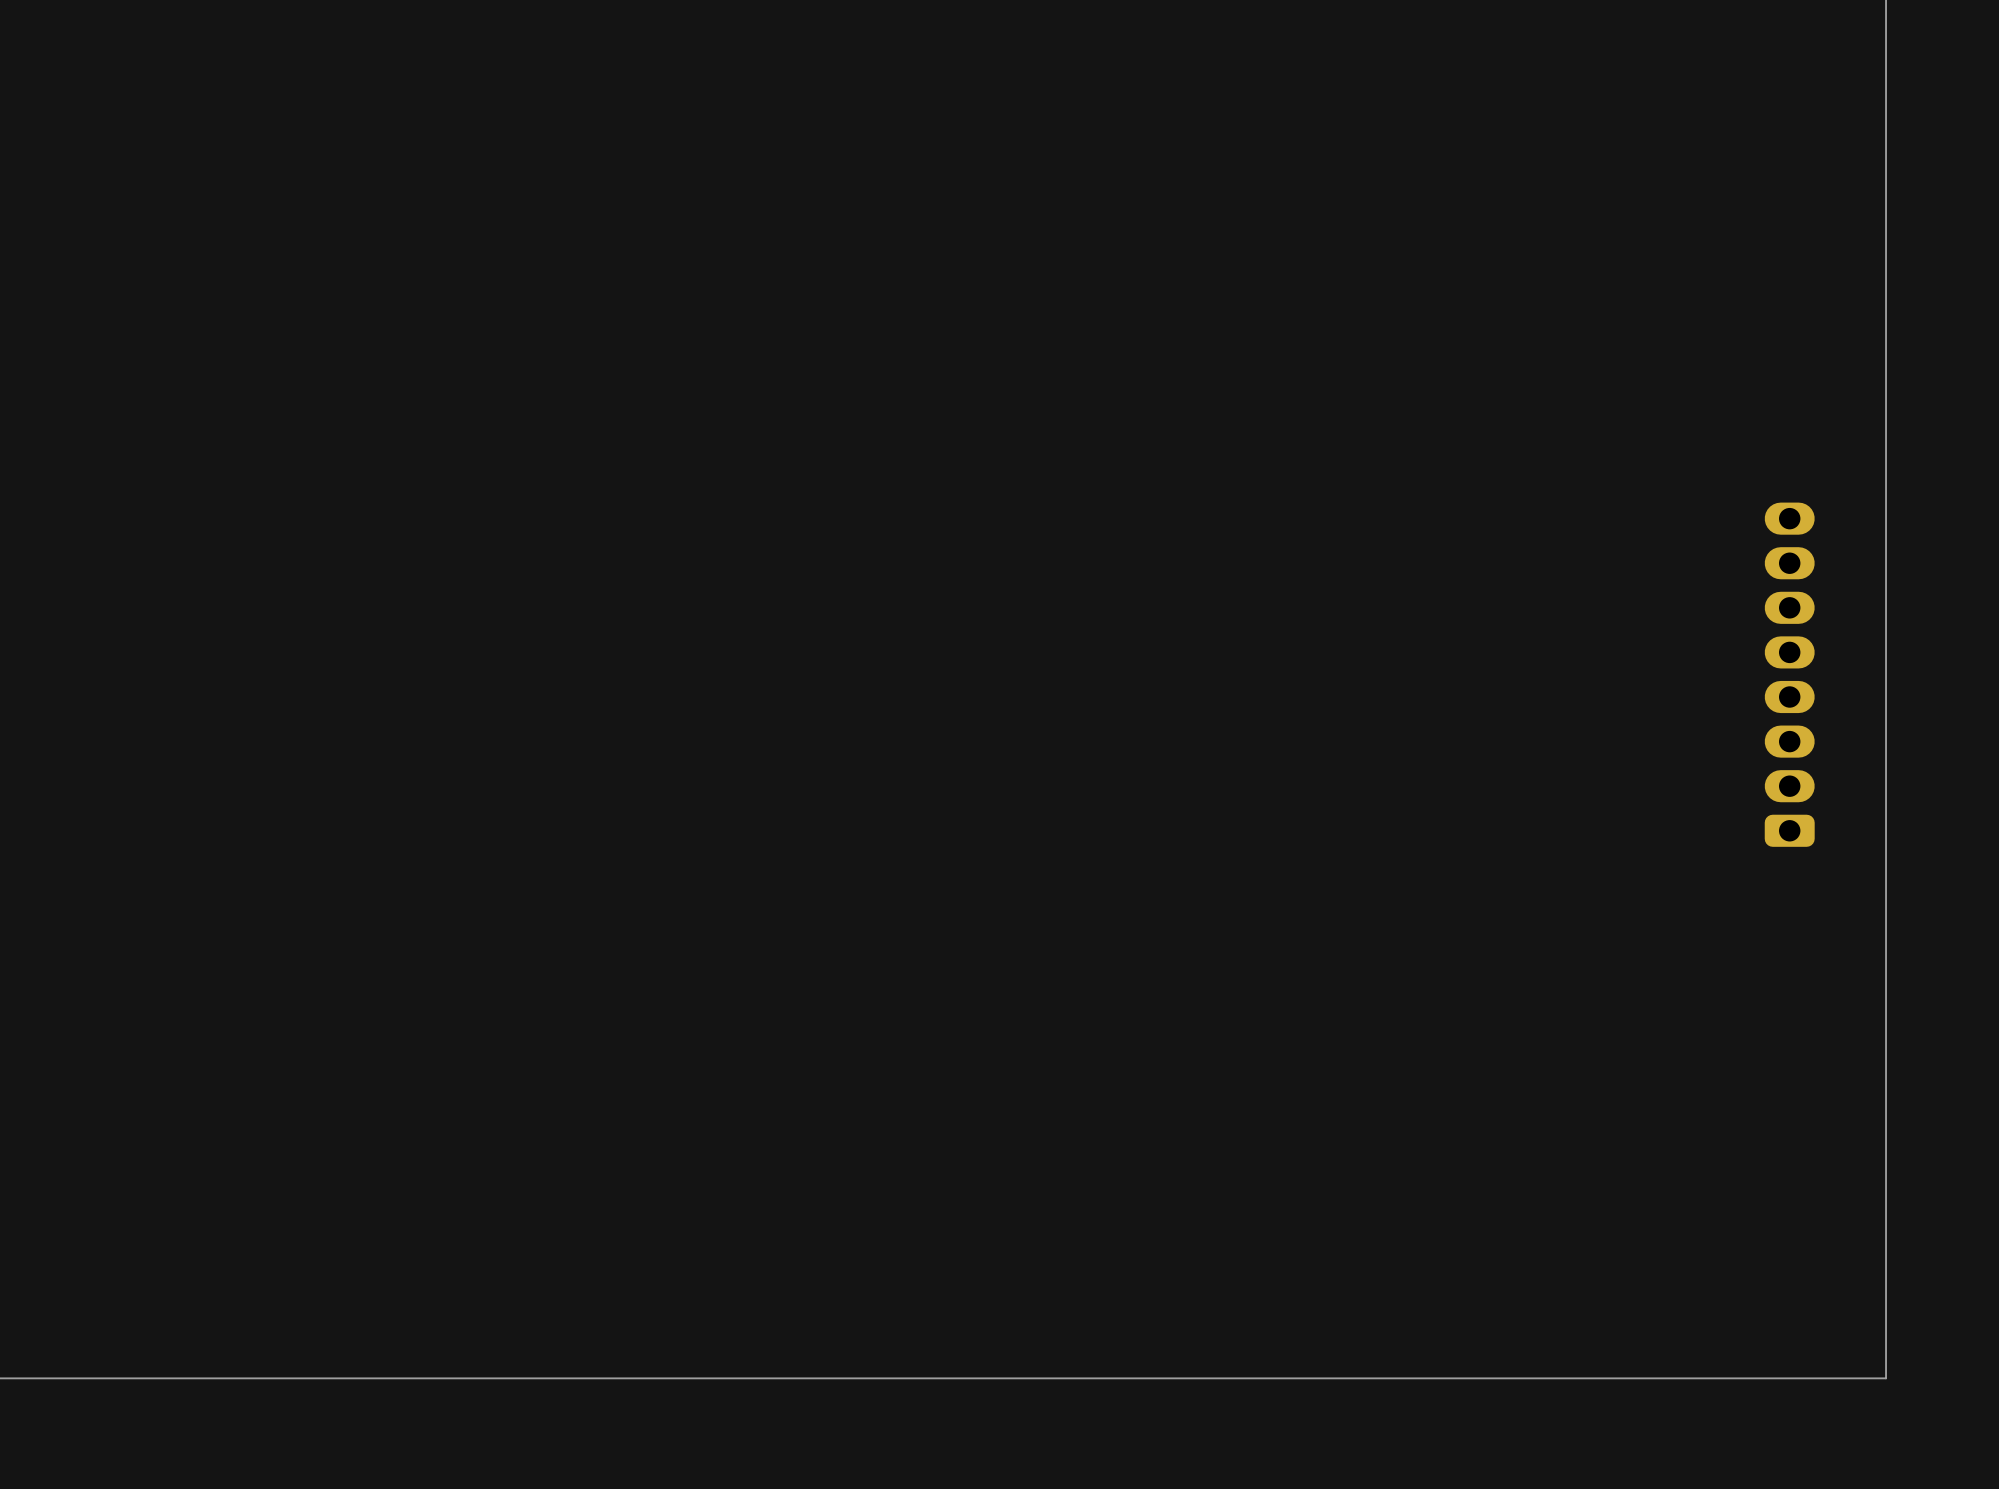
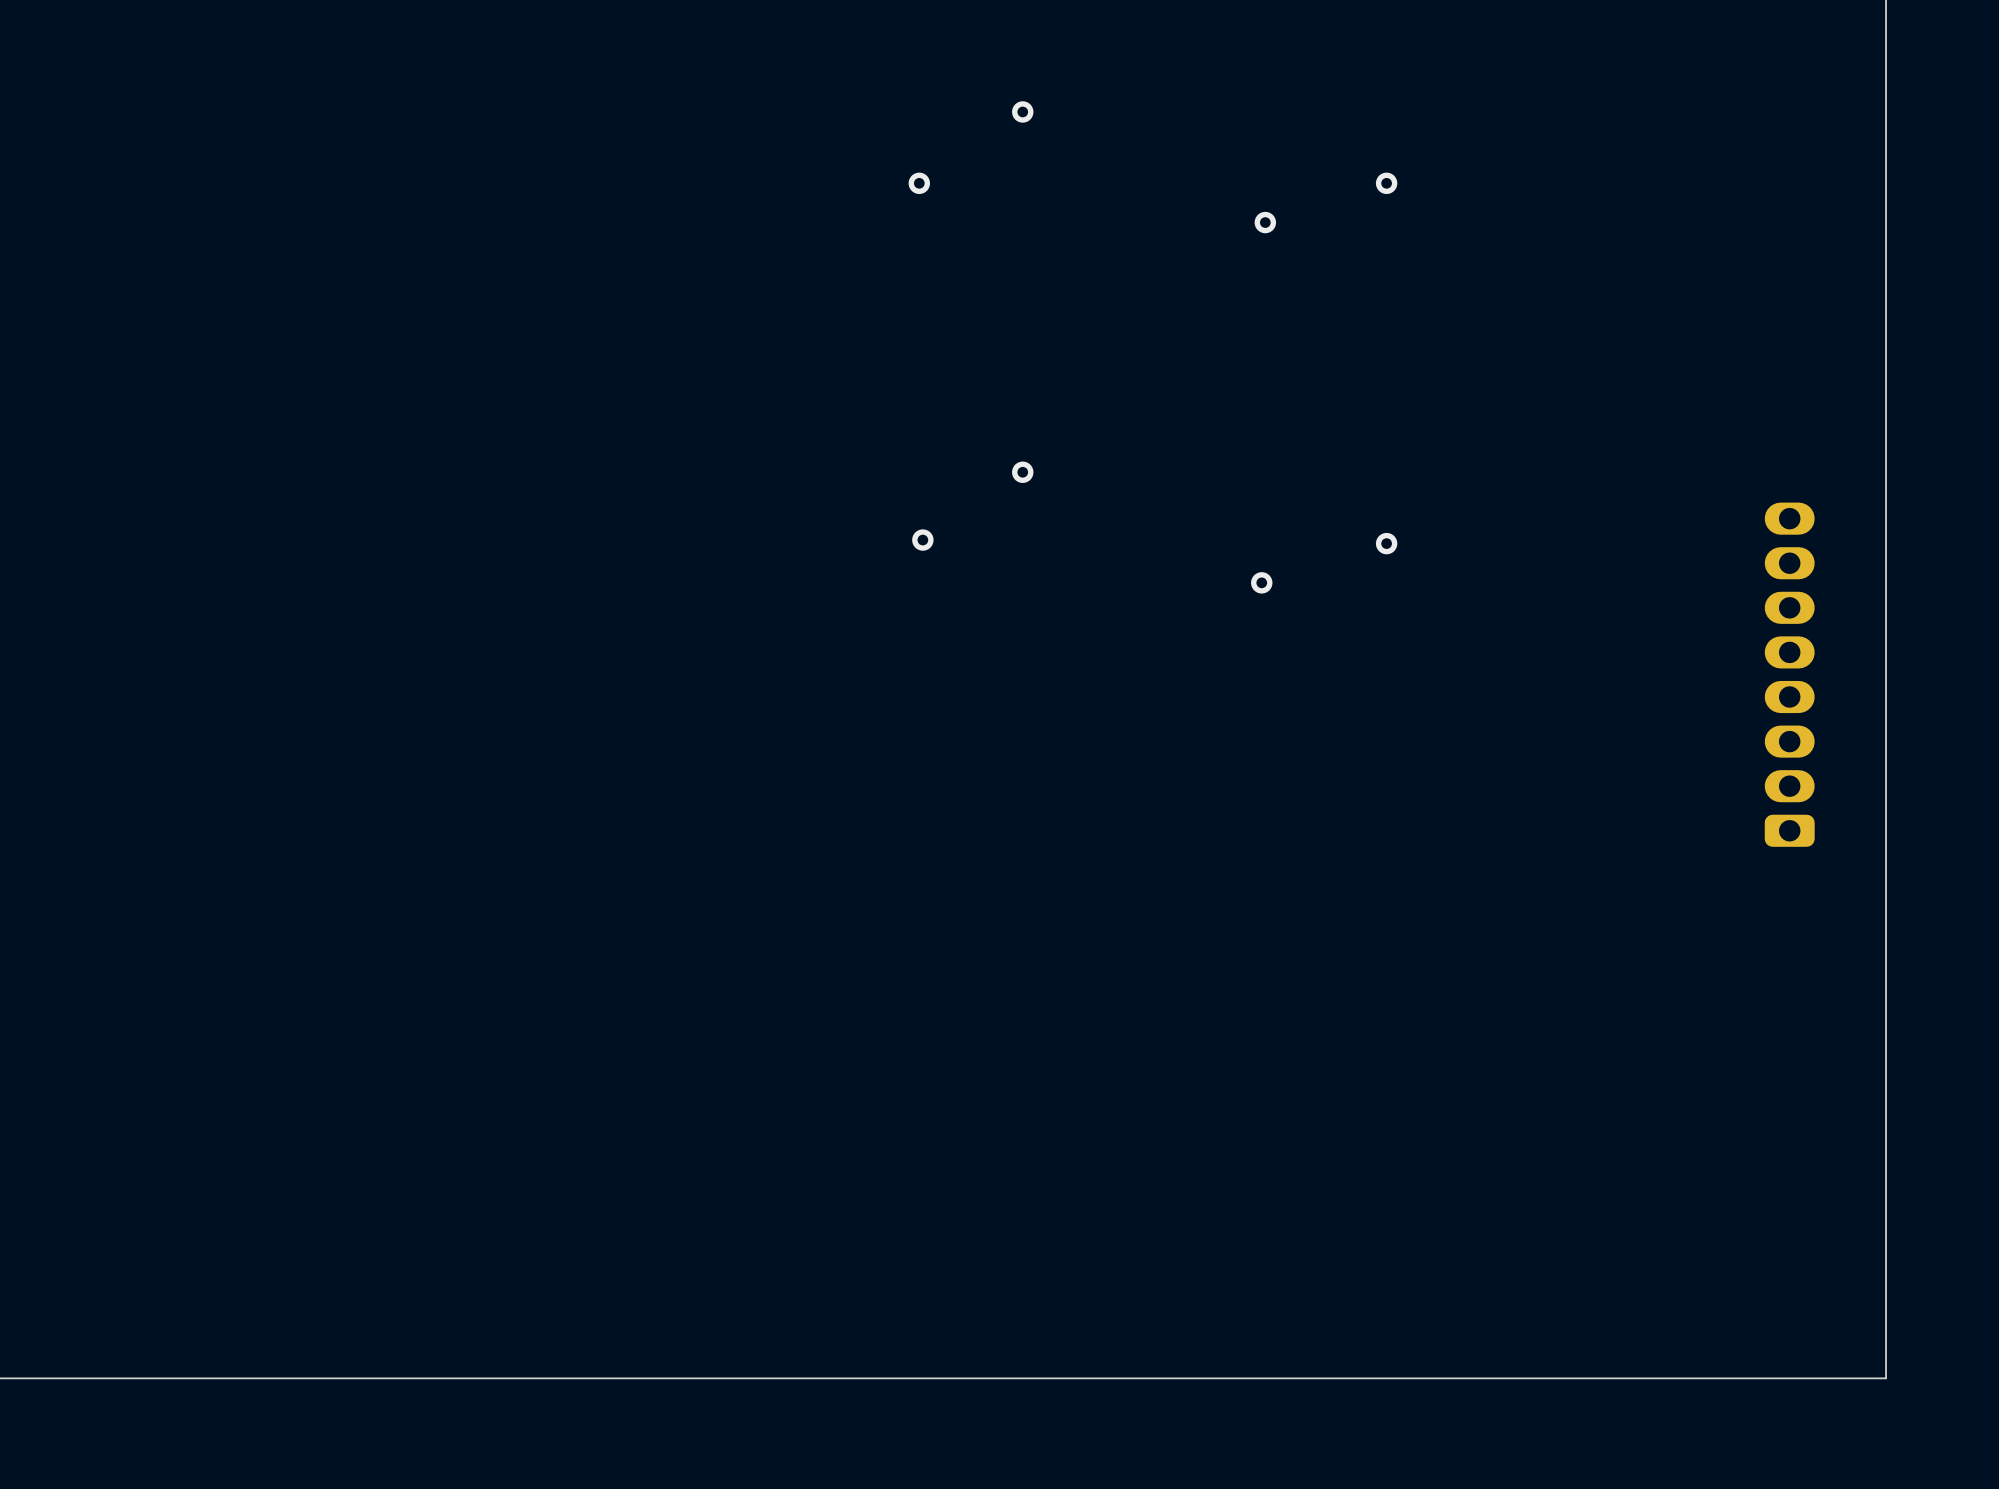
via: none -> (1022, 111)
via: none -> (919, 183)
via: none -> (1386, 183)
via: none -> (1265, 222)
via: none -> (1022, 472)
via: none -> (922, 540)
via: none -> (1386, 543)
via: none -> (1261, 582)

